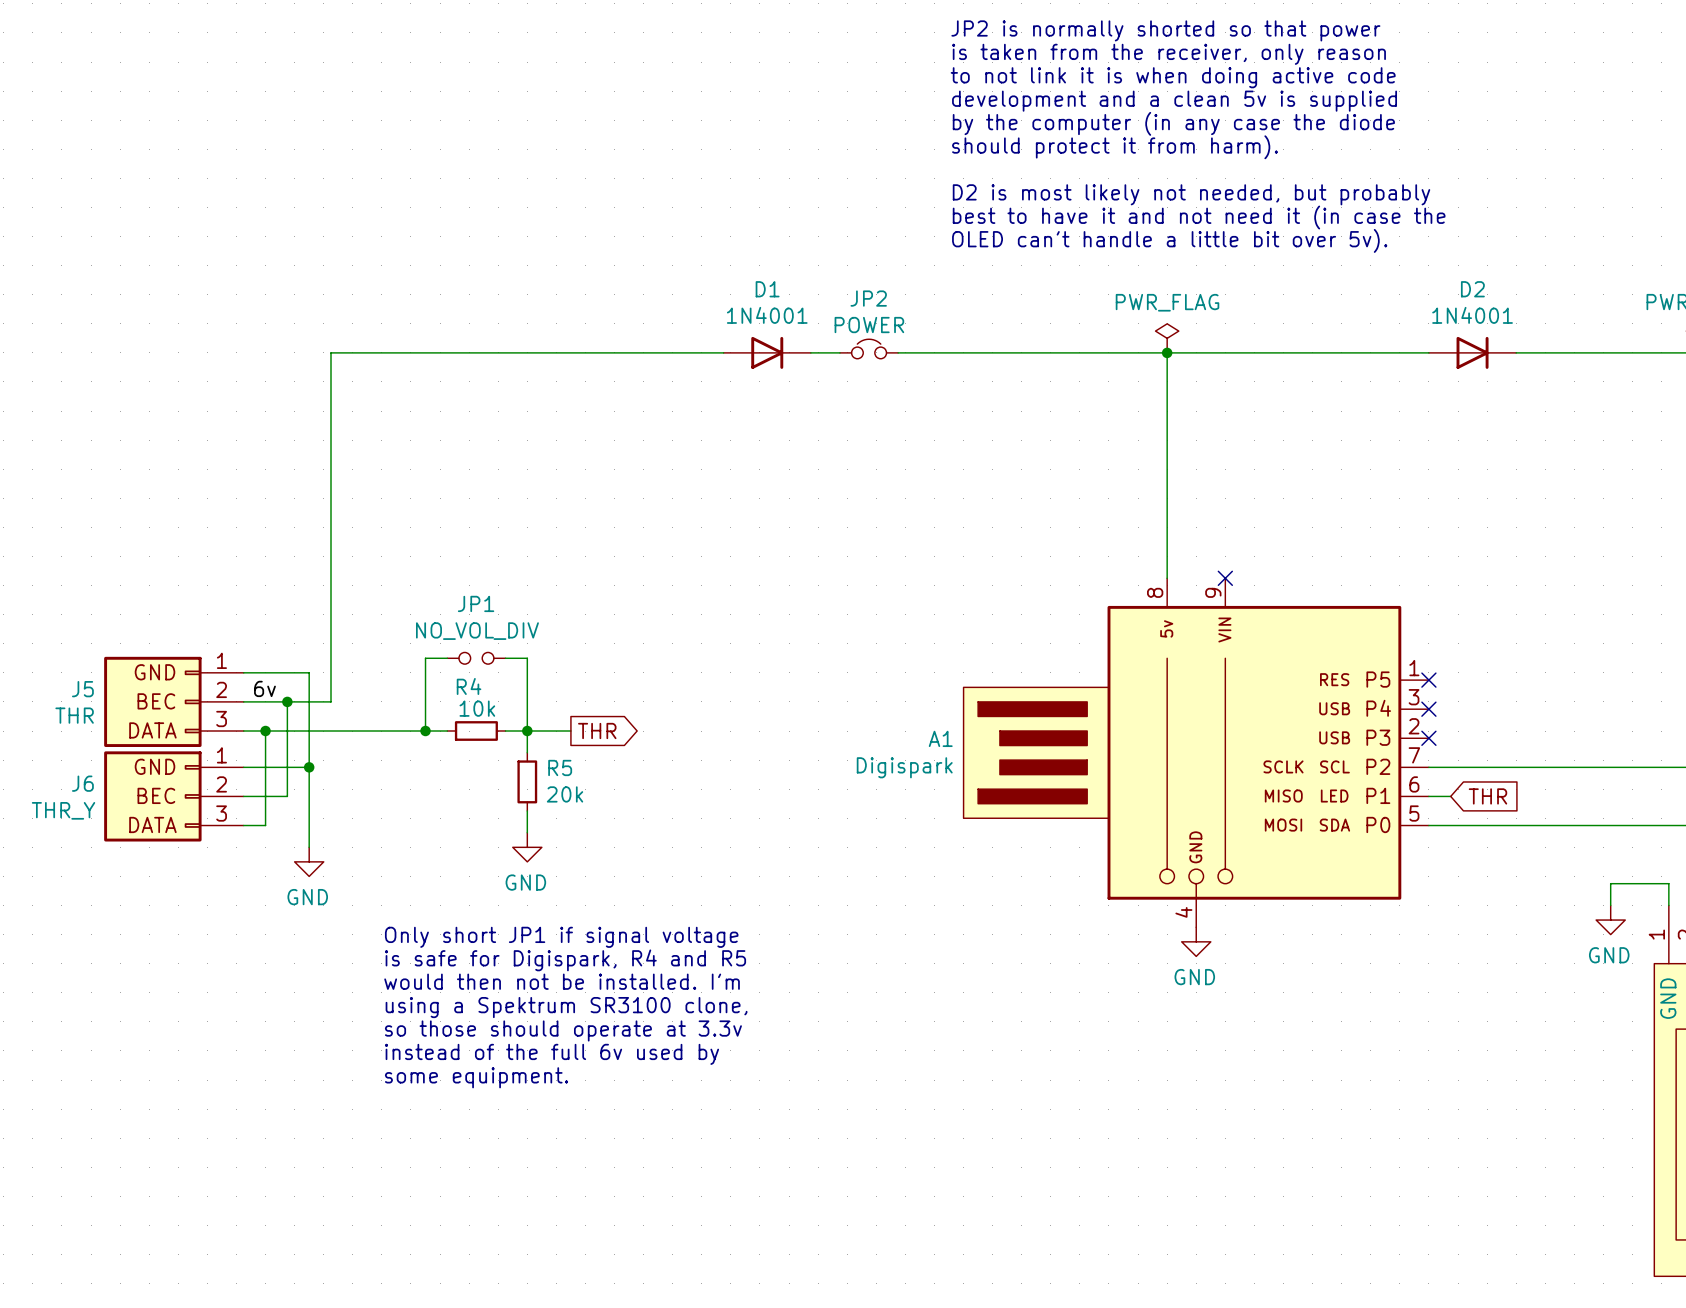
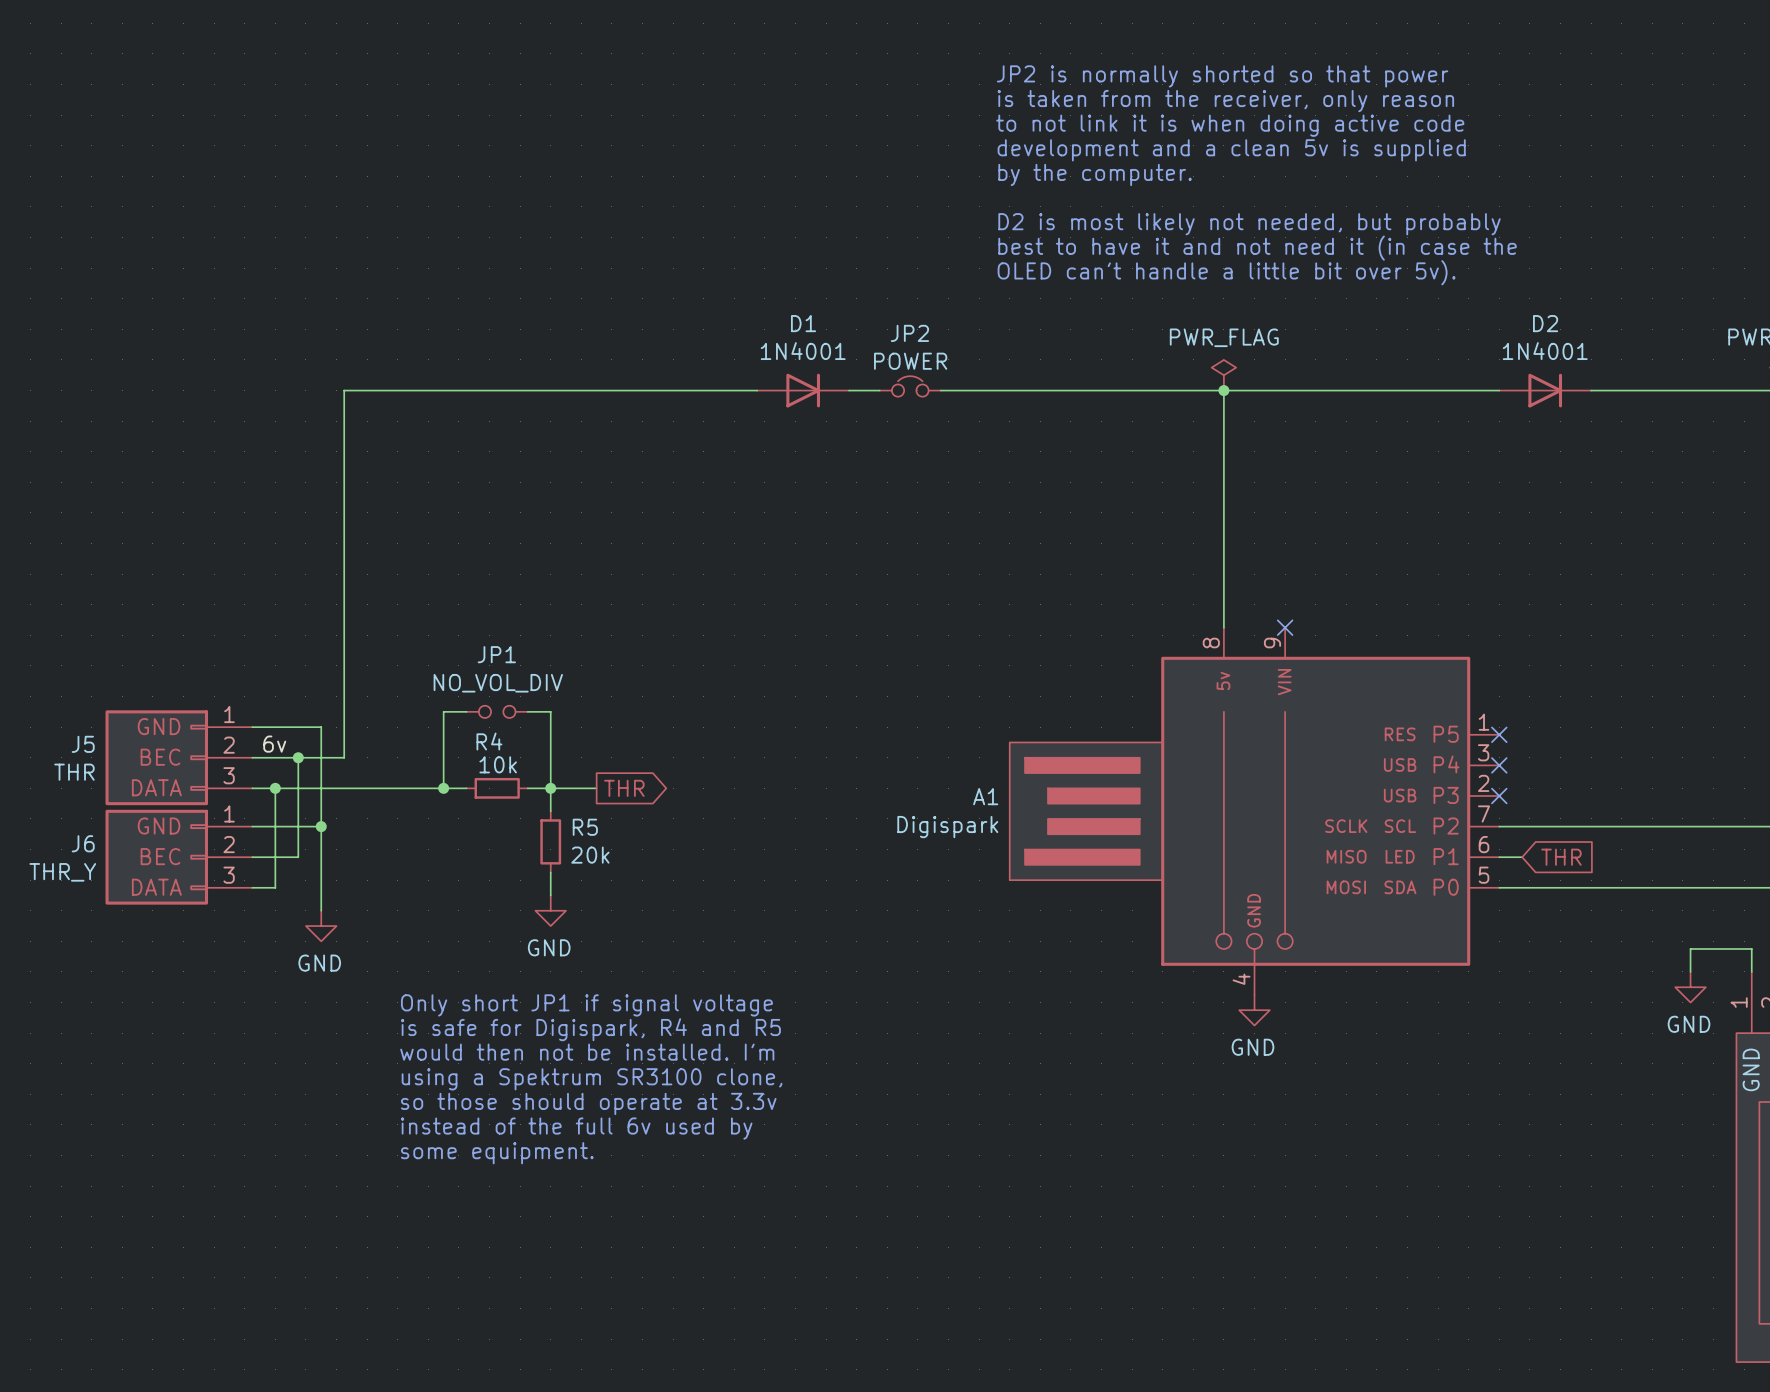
text: JP2 is normally shorted so that power (1165, 30) -> none
text: is taken from the receiver, only reason (1169, 54) -> JP2 is normally shorted so that power (1222, 76)
text: to not link it is when doing active code (1173, 77) -> is taken from the receiver, only reason (1225, 101)
text: development and a clean 5v is supplied (1174, 101) -> to not link it is when doing active code (1230, 125)
text: by the computer (in any case the diode (1173, 123) -> development and a clean 5v is supplied (1231, 150)
text: should protect it from harm). (1114, 147) -> by the computer. (1095, 174)

